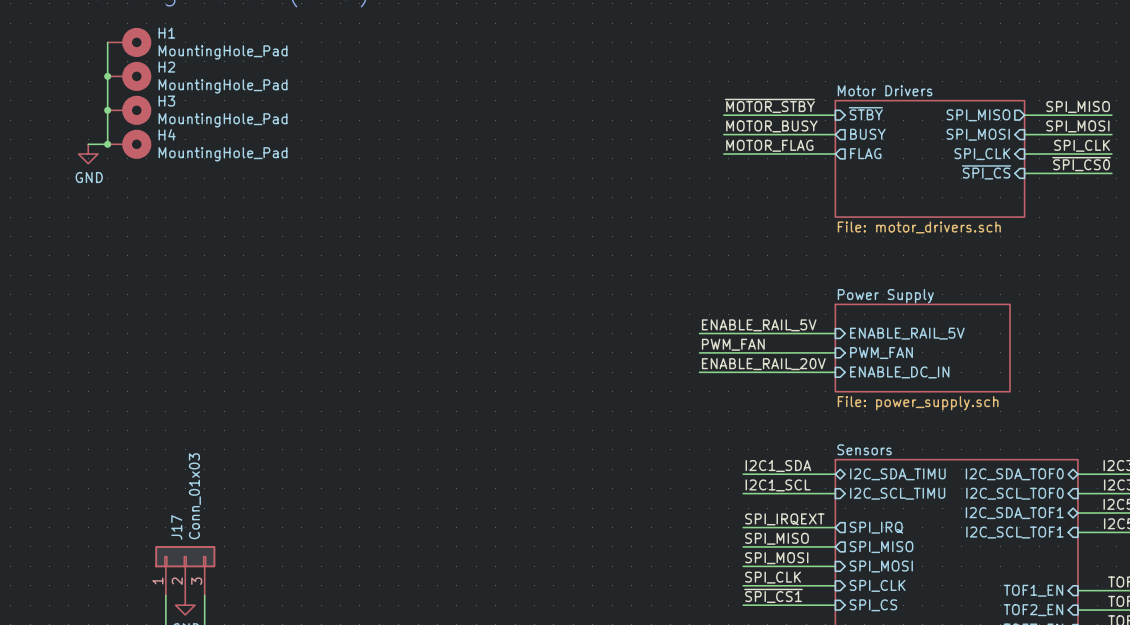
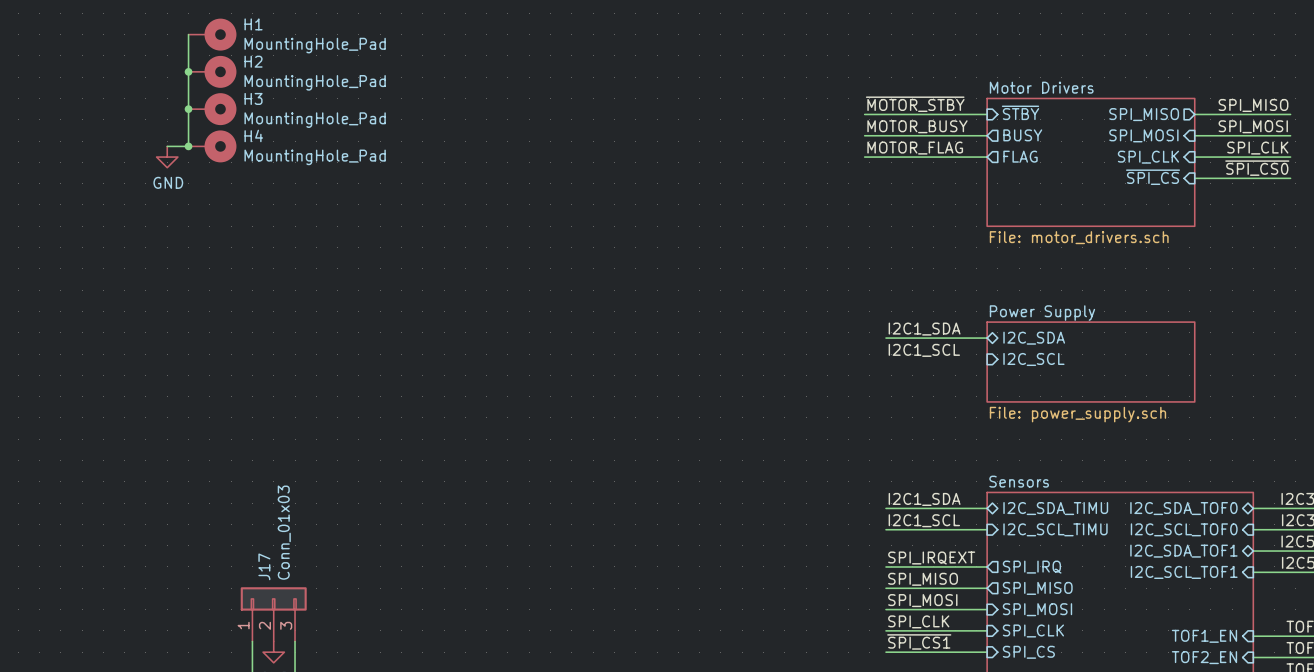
label: none -> I2C1_SDA (924, 329)
wire: none -> (885, 338) (987, 338)
sheet pin: none -> I2C_SDA (1034, 338)
label: ENABLE_RAIL_5V (759, 325) -> none
label: none -> I2C1_SCL (924, 350)
wire: (699, 333) (835, 333) -> none
sheet pin: ENABLE_RAIL_5V (907, 333) -> I2C_SCL (1033, 359)
sheet Power Supply: none -> File: power_supply.sch (1090, 362)
label: PWM_FAN (733, 344) -> none
sheet Power Supply: File: power_supply.sch (922, 348) -> none
wire: (699, 352) (835, 352) -> none
sheet pin: PWM_FAN (881, 353) -> none
label: ENABLE_RAIL_20V (763, 364) -> none
wire: (699, 372) (835, 372) -> none
sheet pin: ENABLE_DC_IN (899, 372) -> none

